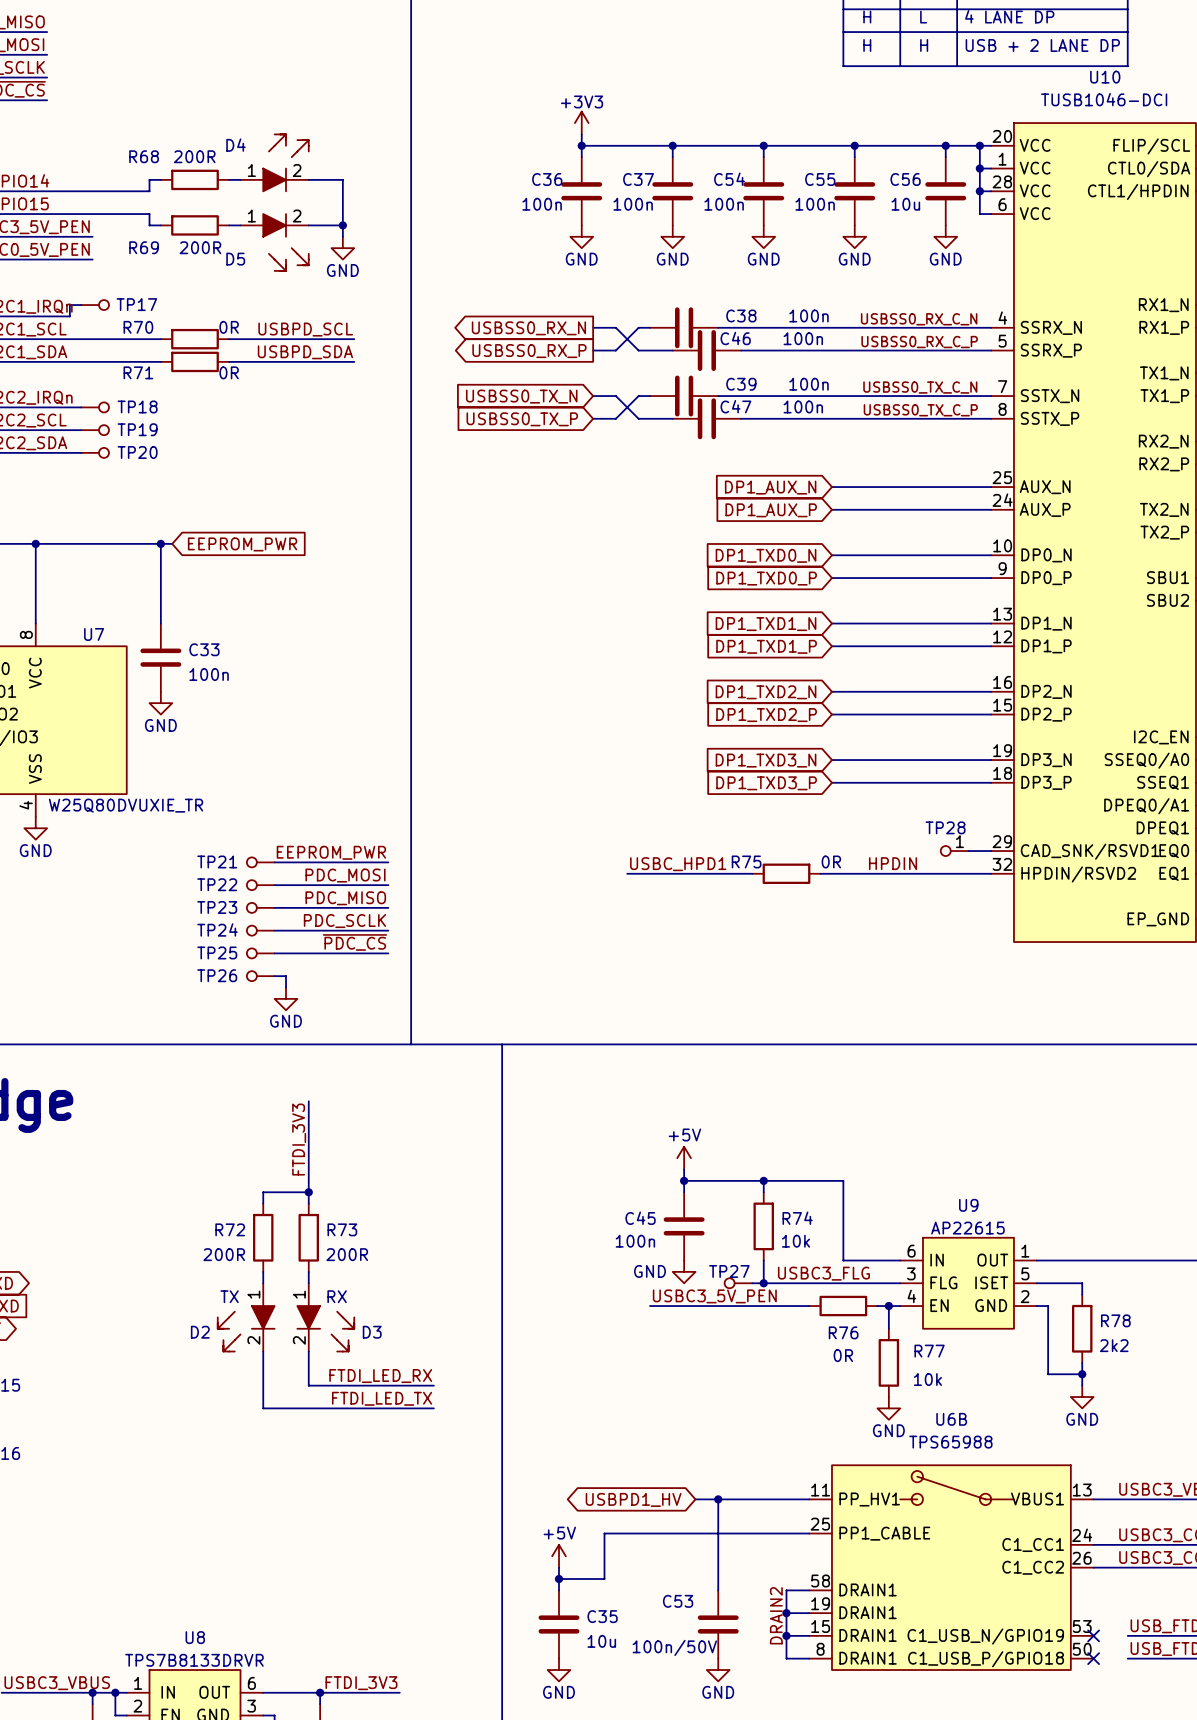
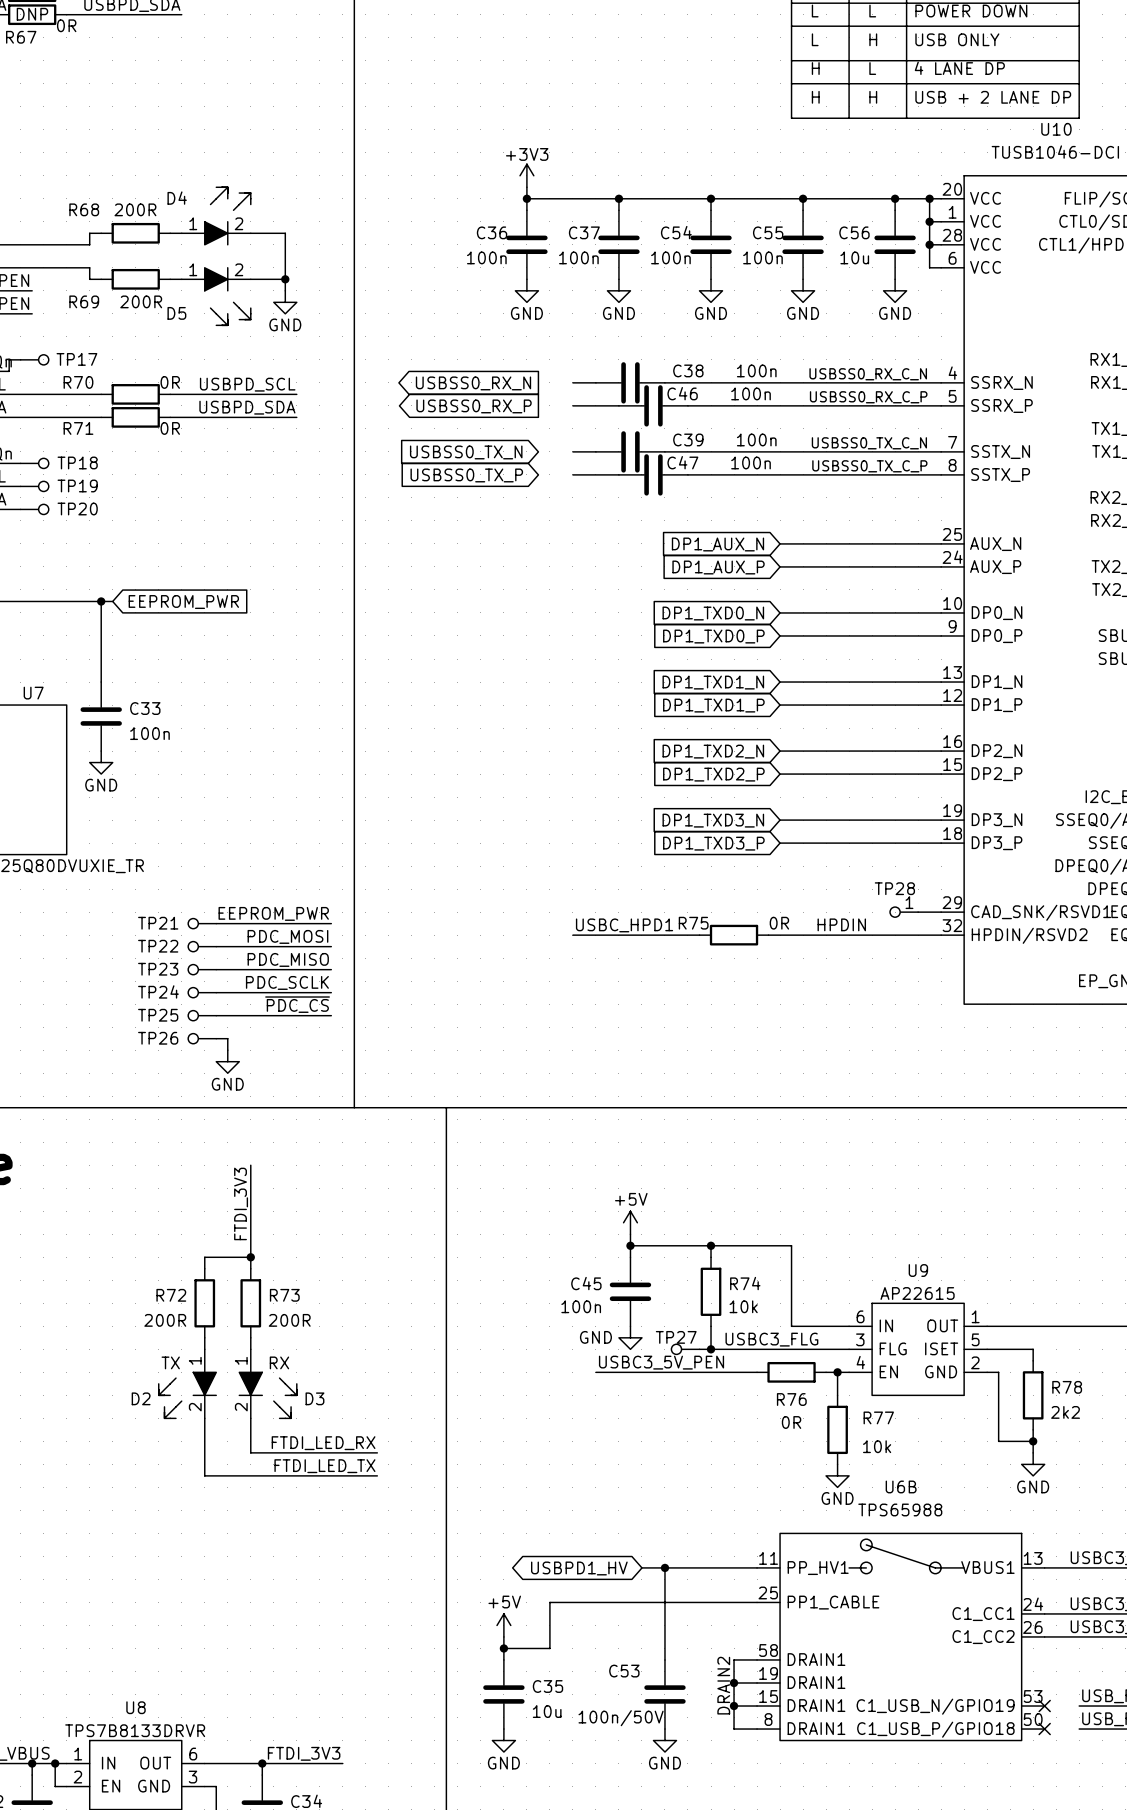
wire: (593, 327) (615, 327) (638, 350) -> (572, 405) (584, 405)
wire: (638, 327) (615, 350) (593, 350) -> (584, 382) (572, 382)
wire: (593, 396) (615, 396) (638, 418) -> (572, 474) (584, 474)
wire: (638, 396) (615, 418) (593, 418) -> (584, 451) (572, 451)

